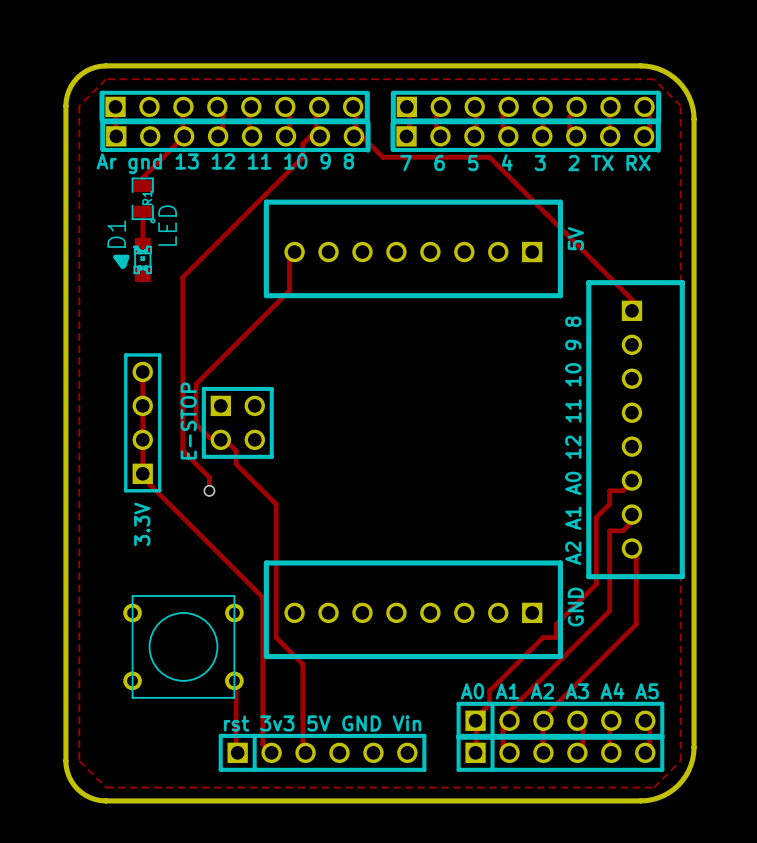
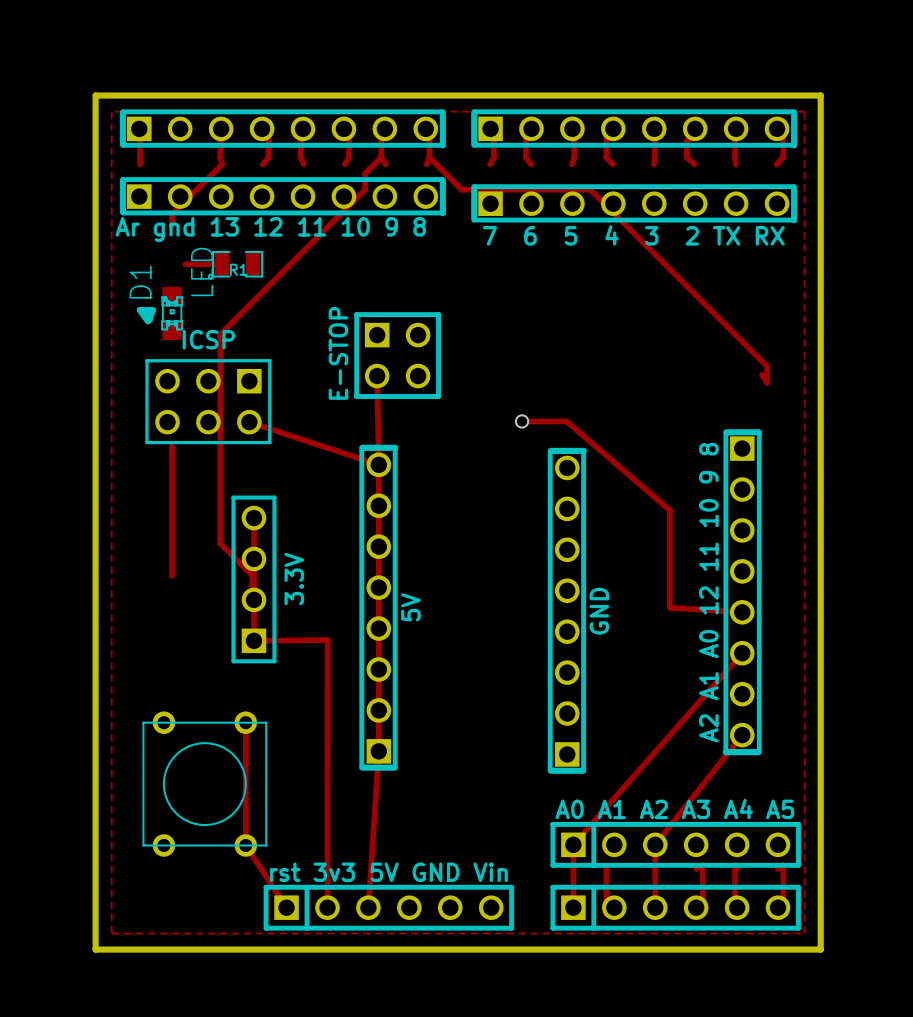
zone outline: (106, 79) (653, 79) (680, 105) (680, 760) (653, 787) (106, 787) (79, 760) (79, 105) (106, 79) -> (111, 111) (111, 933) (804, 933) (804, 111) (111, 111)
part position: (235, 136) -> (282, 196)
part position: (525, 136) -> (634, 203)
R1 rotation: 0° (143, 200) -> 90° clockwise (235, 265)
R1 position: (143, 200) -> (235, 265)
track: (142, 211) (142, 250) (142, 245) -> none
track: none -> (185, 264) (222, 264)
part: 5V (413, 248) -> none
track: (294, 252) (289, 250) (289, 290) (196, 384) (196, 424) (209, 437) (222, 437) -> none
track: none -> (377, 376) (378, 464)
part: none -> ICSP (208, 401)
track: none -> (522, 421) (566, 421) (669, 510) (669, 607) (742, 612)
via: none -> (522, 421)
track: none -> (249, 422) (378, 464)
part position: (142, 422) -> (253, 579)
part position: (237, 422) -> (397, 355)
part: A2 A1 A0 12 11 10 9 8 (635, 429) -> none
track: (222, 437) (236, 450) (236, 464) (276, 504) (276, 637) (302, 664) (302, 757) (305, 752) -> (378, 464) (378, 751) (368, 907)
track: (142, 473) (142, 477) (262, 597) (262, 744) (276, 757) (271, 752) -> (253, 518) (253, 640) (327, 640) (327, 907)
track: (631, 480) (636, 477) (622, 490) (609, 490) (609, 504) (596, 517) (596, 584) (556, 624) (556, 637) (542, 637) (489, 690) (489, 704) (476, 717) (476, 757) (475, 752) -> (742, 653) (573, 844) (573, 907)
via: (209, 490) -> none
part: none -> A2 A1 A0 12 11 10 9 8 (742, 592)
part: none -> 5V (378, 607)
part: none -> GND (567, 610)
track: (631, 514) (636, 517) (622, 530) (609, 530) (609, 610) (502, 717) (509, 720) -> none
part value position: 3.3V (142, 524) -> 3.3V (294, 579)
track: (631, 548) (636, 544) (636, 624) (542, 717) (542, 757) (543, 752) -> (742, 735) (655, 844) (655, 907)
part: GND (413, 609) -> none
part rotation: 0° (183, 646) -> 90° clockwise (204, 784)
track: (234, 680) (236, 677) (236, 757) (237, 752) -> (245, 722) (245, 845) (286, 907)
A0 A1 A2 A3 A4 A5 position: (560, 720) -> (675, 844)
board edge: (65, 760) (68, 776) (77, 789) (90, 797) (105, 800) (640, 800) (663, 795) (678, 785) (691, 765) (694, 747) (694, 119) (691, 101) (678, 81) (663, 71) (640, 65) (106, 65) (90, 68) (77, 77) (68, 90) (65, 105) (65, 760) -> (95, 95) (95, 949) (820, 949) (820, 95) (95, 95)

